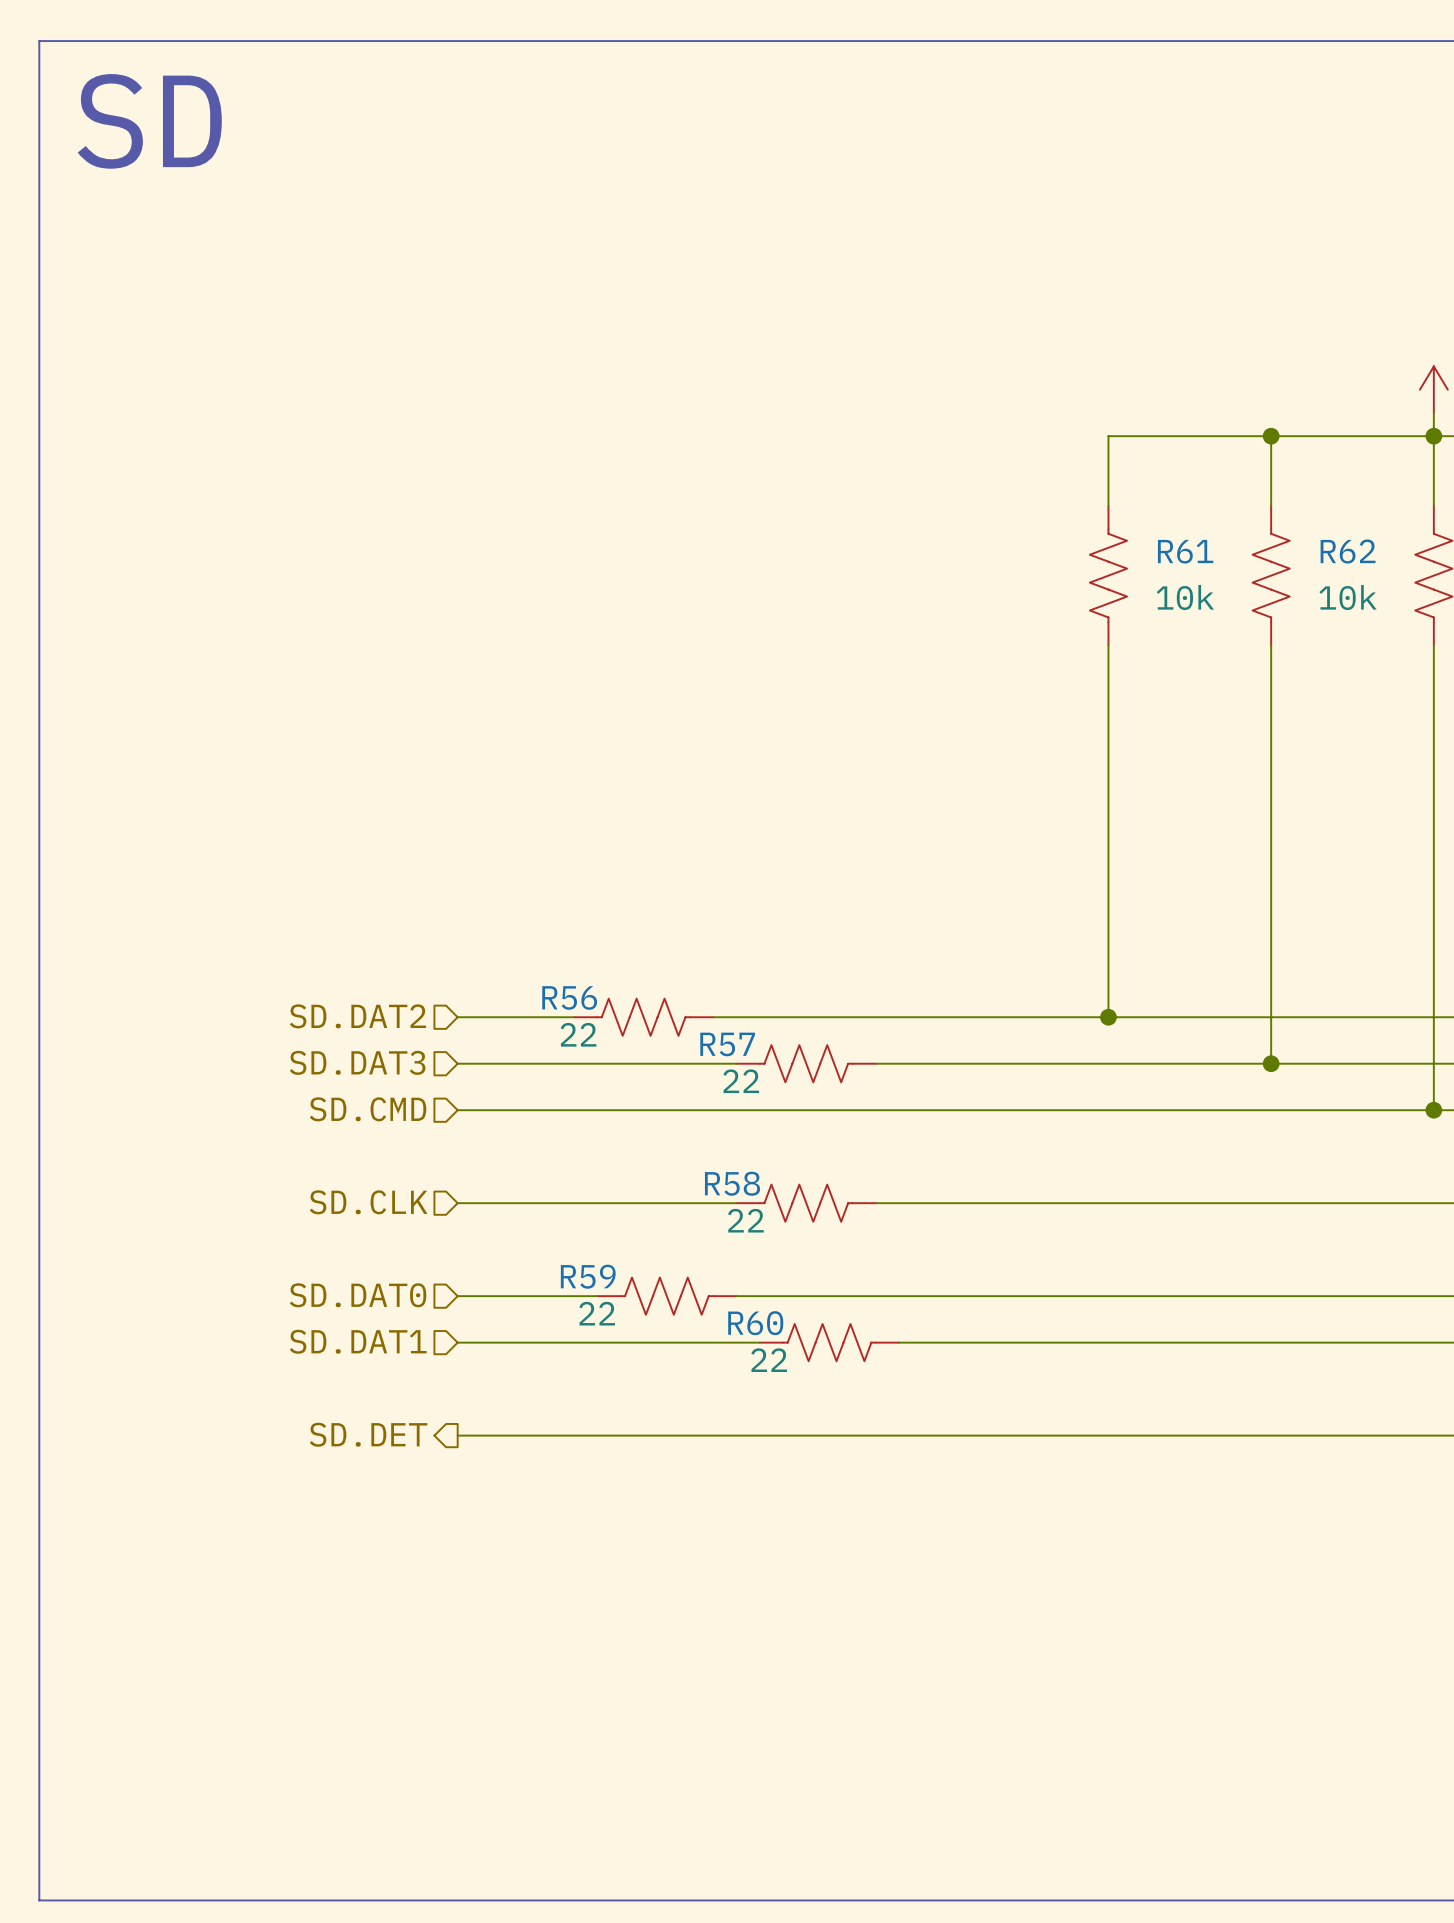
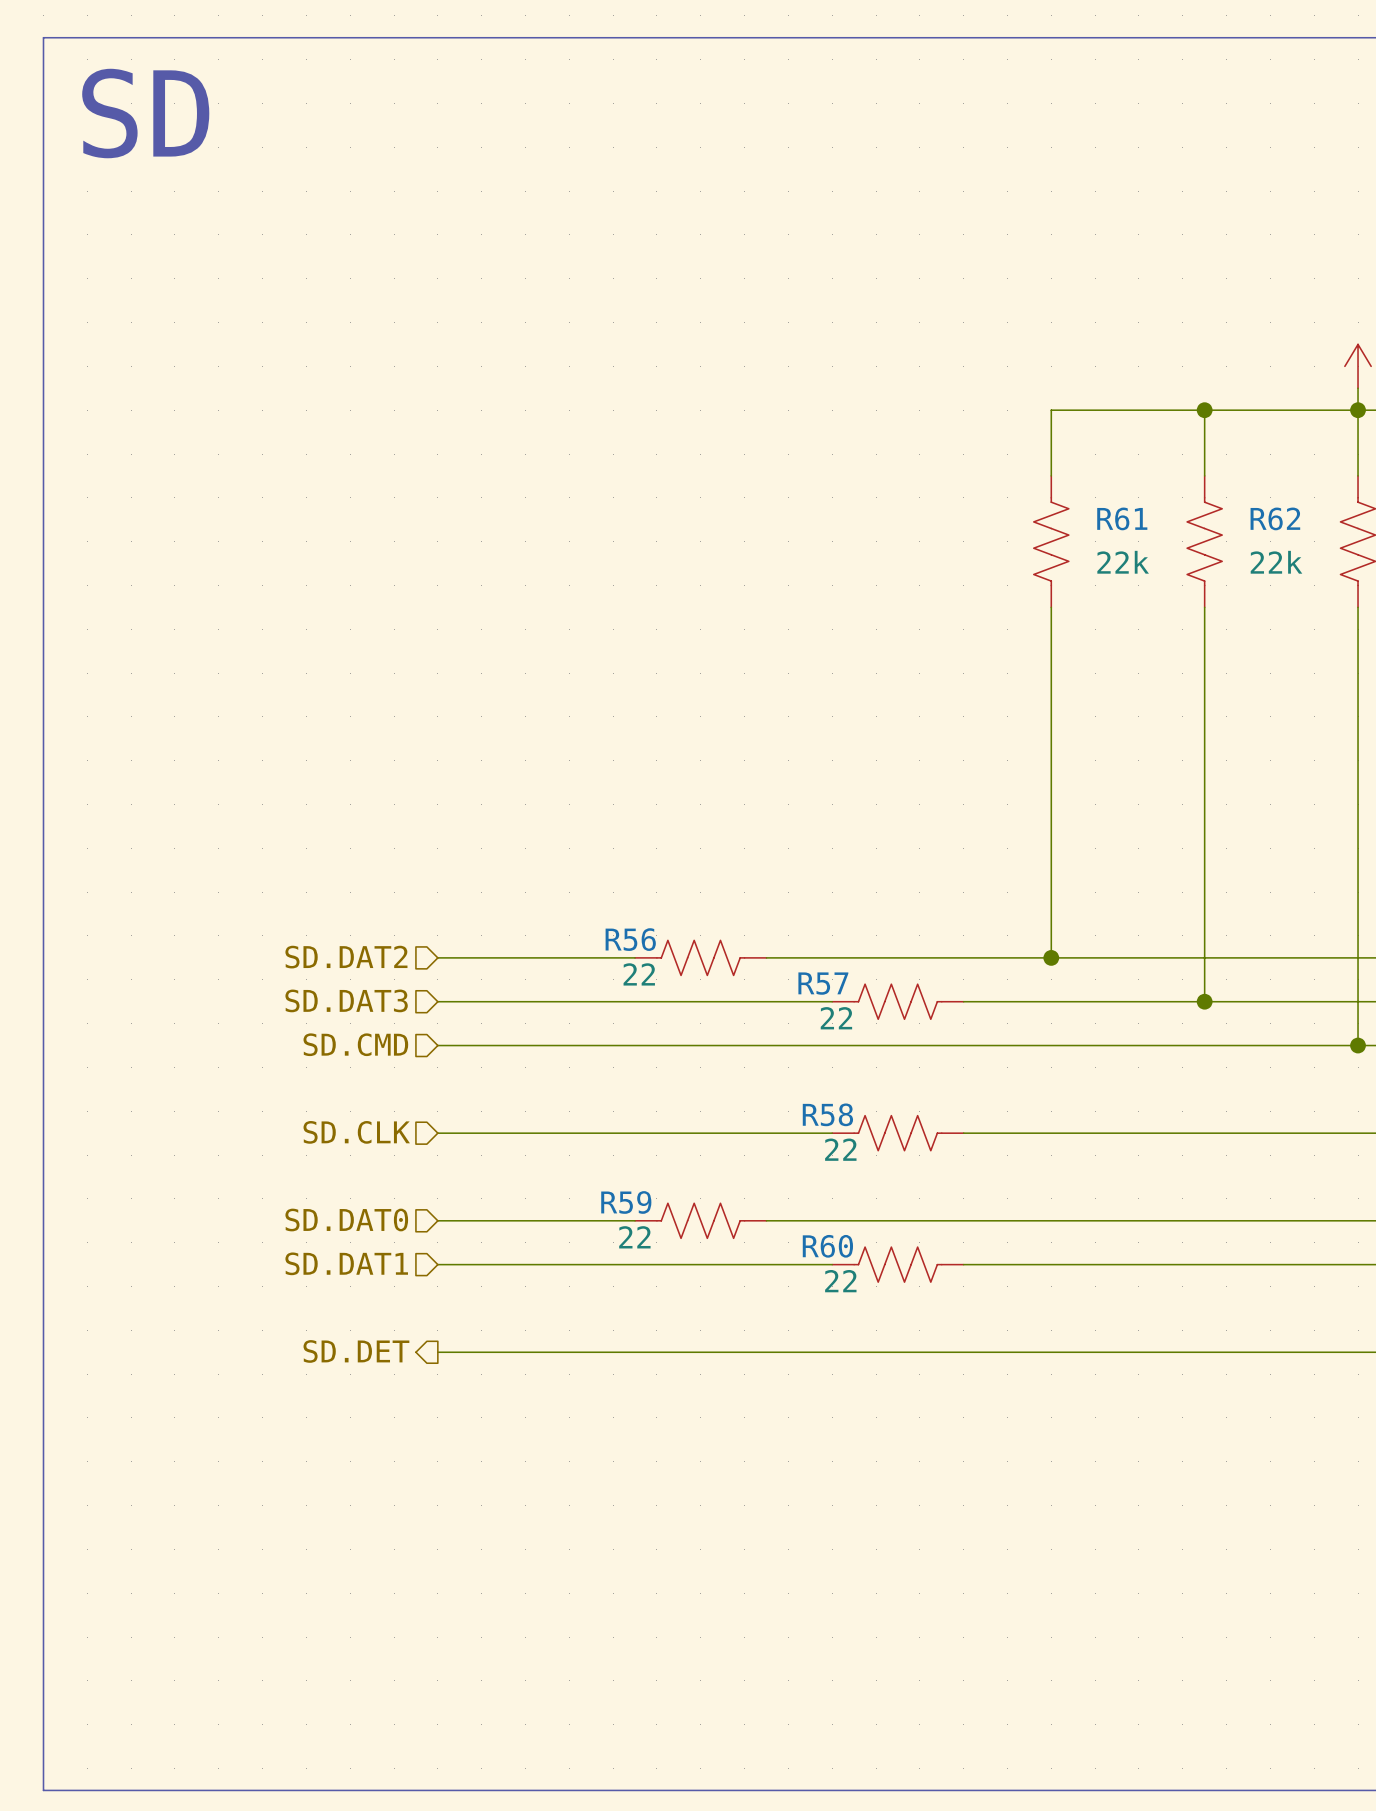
R61 value: 10k (1185, 597) -> 22k (1123, 562)
R62 value: 10k (1348, 597) -> 22k (1276, 562)
R56 position: (643, 1017) -> (700, 957)
wire: (713, 1017) (806, 1017) -> (547, 957) (635, 957)
R57 position: (806, 1063) -> (897, 1001)
wire: (876, 1063) (1015, 1063) -> (832, 1001) (700, 1001)
R58 position: (806, 1203) -> (897, 1133)
wire: (876, 1203) (1015, 1203) -> (832, 1133) (700, 1133)
R59 position: (666, 1296) -> (700, 1220)
wire: (736, 1296) (806, 1296) -> (569, 1220) (635, 1220)
R60 position: (829, 1342) -> (897, 1264)
wire: (899, 1342) (1015, 1342) -> (722, 1264) (832, 1264)

